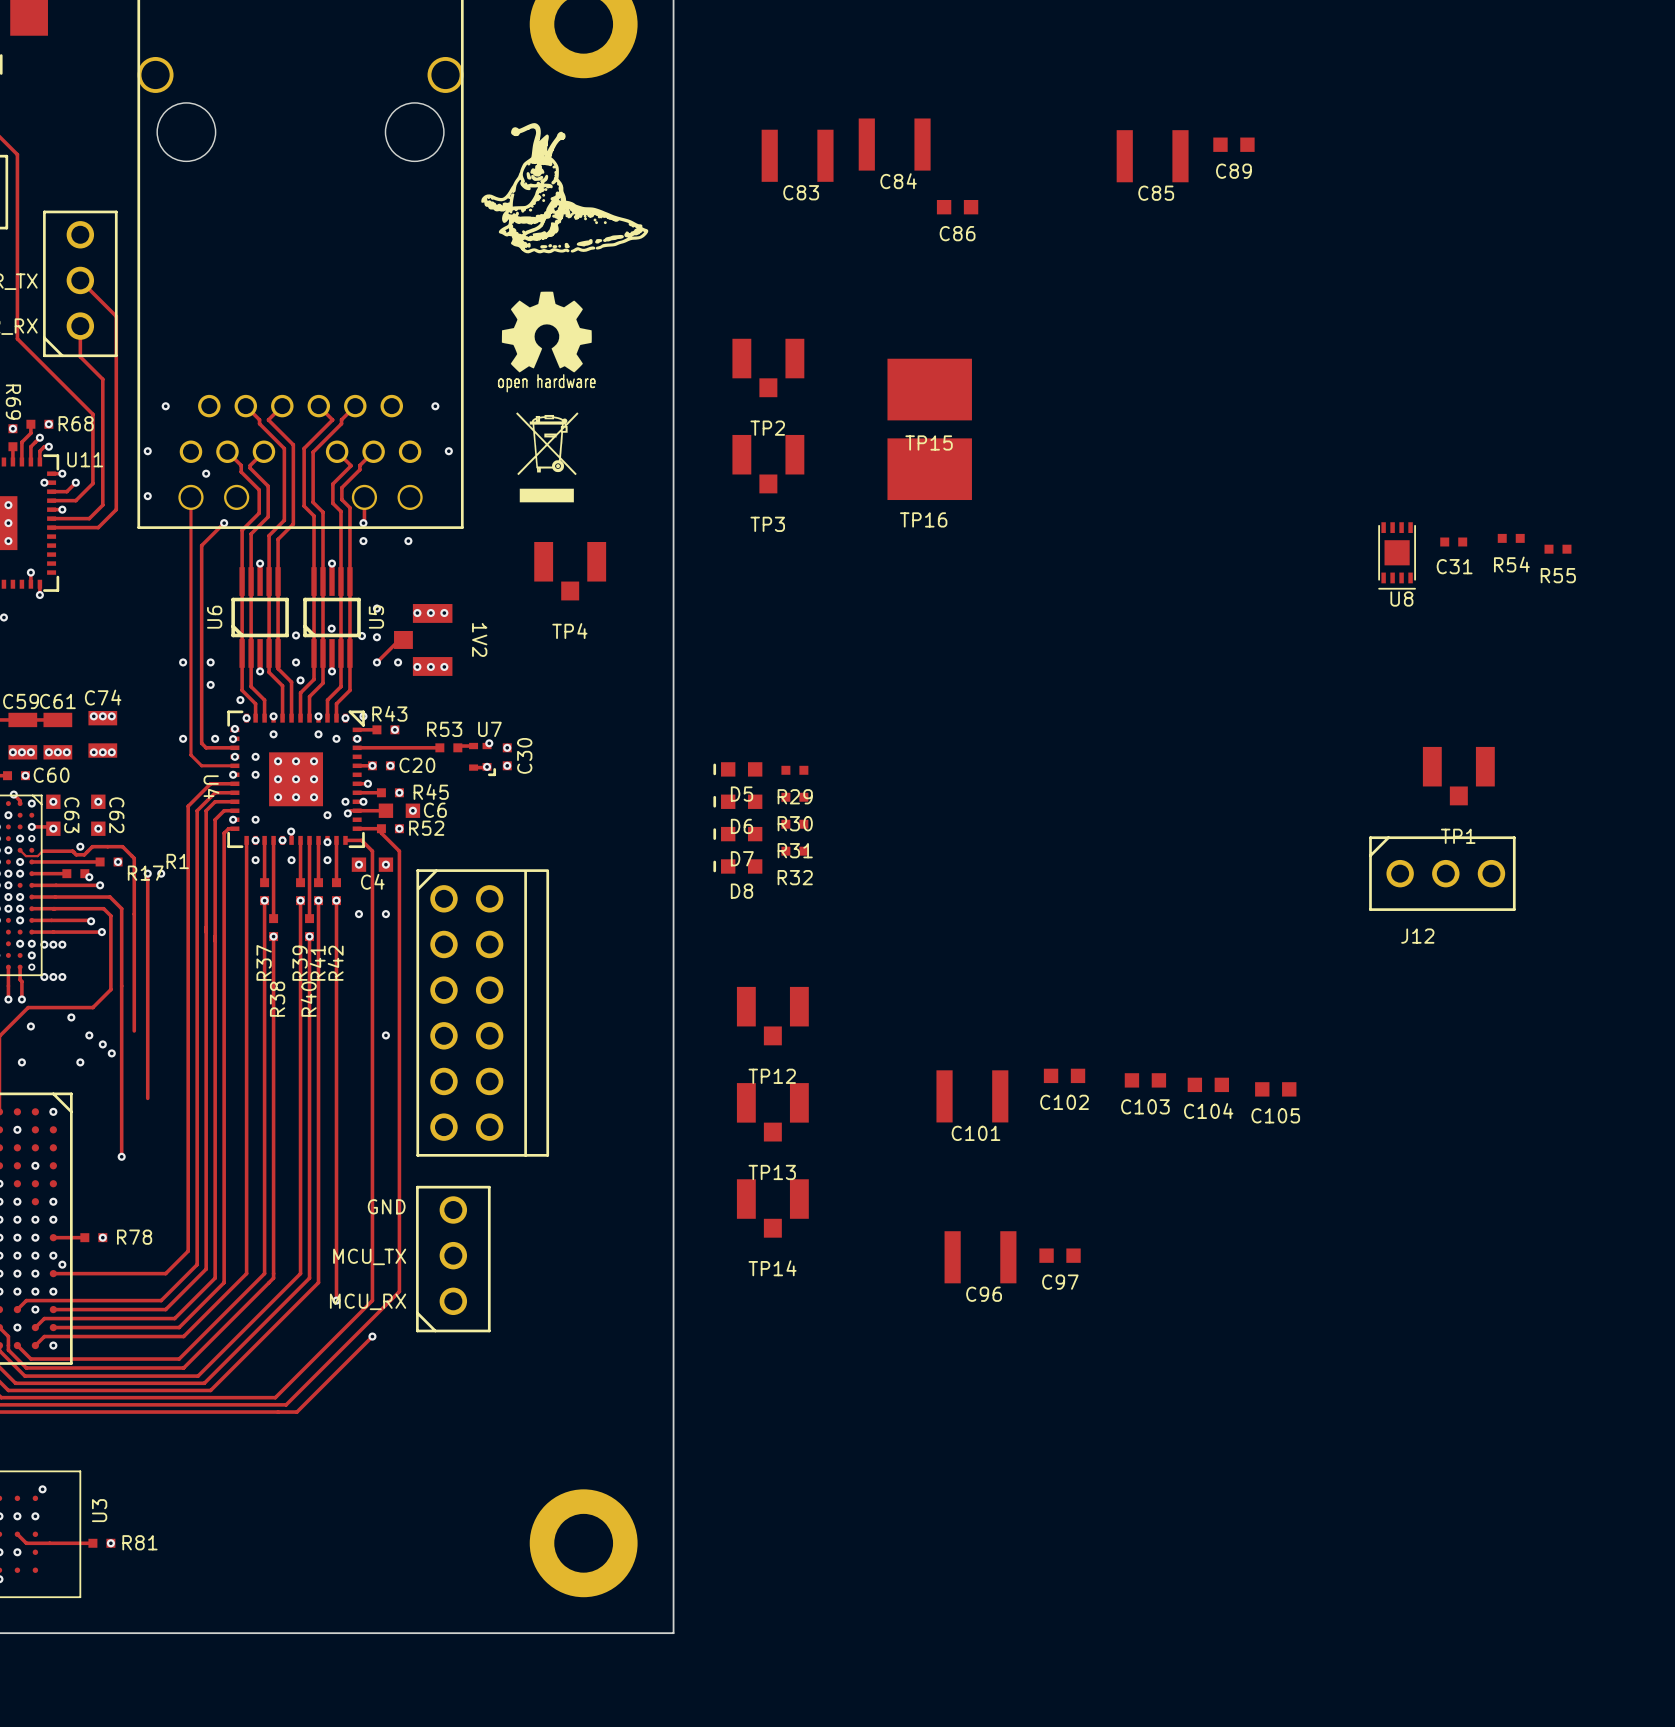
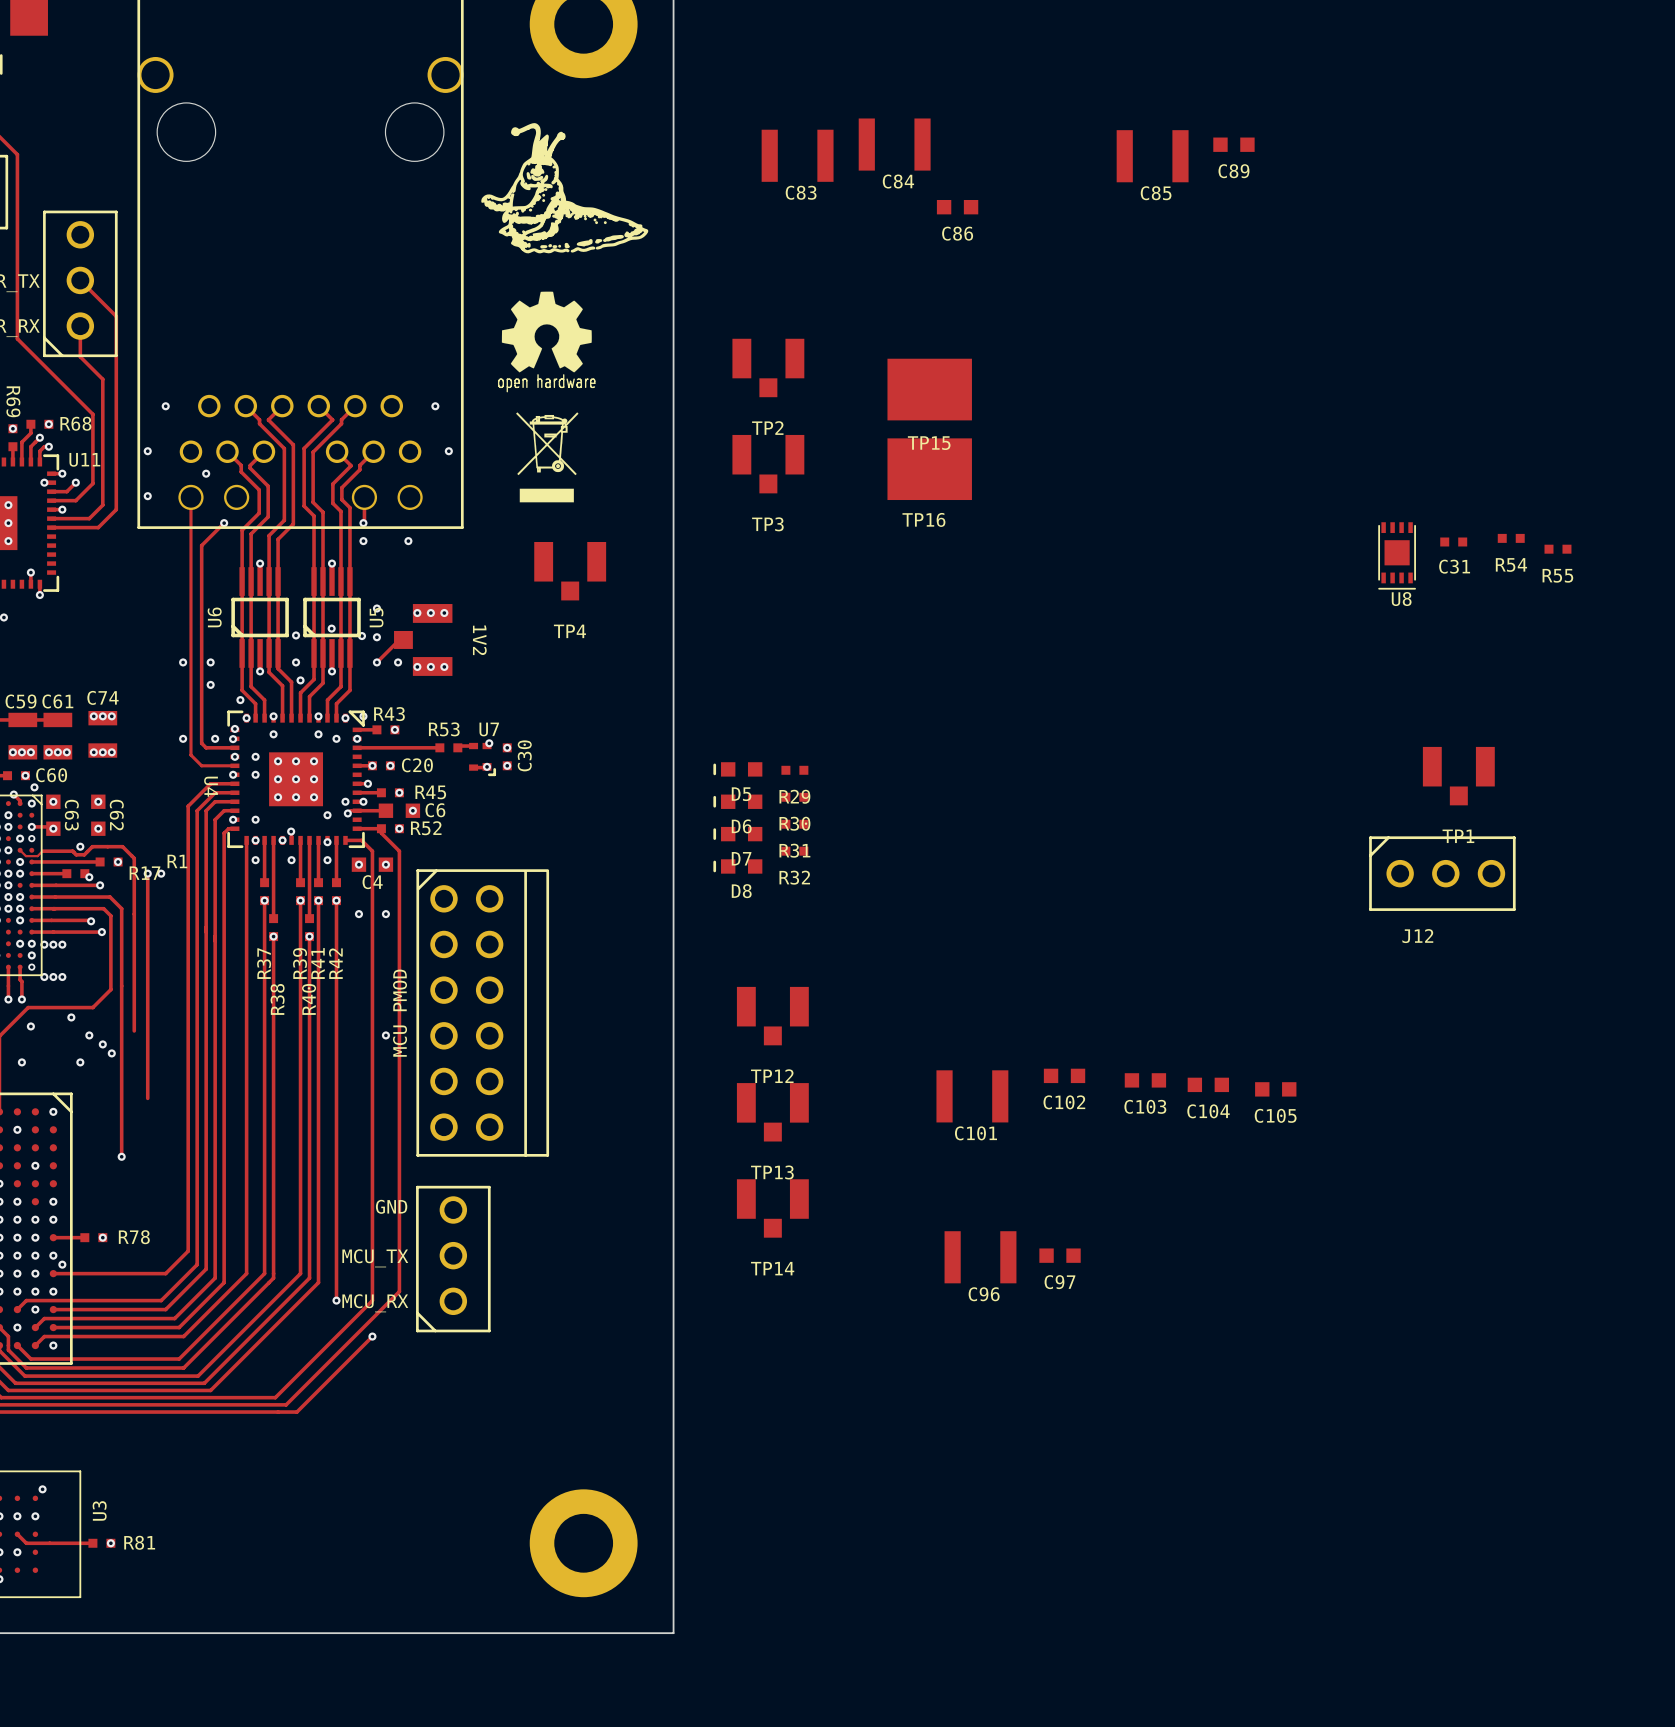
via: none -> (34, 787)
via: none -> (8, 826)
text: none -> MCU PMOD (400, 1013)

